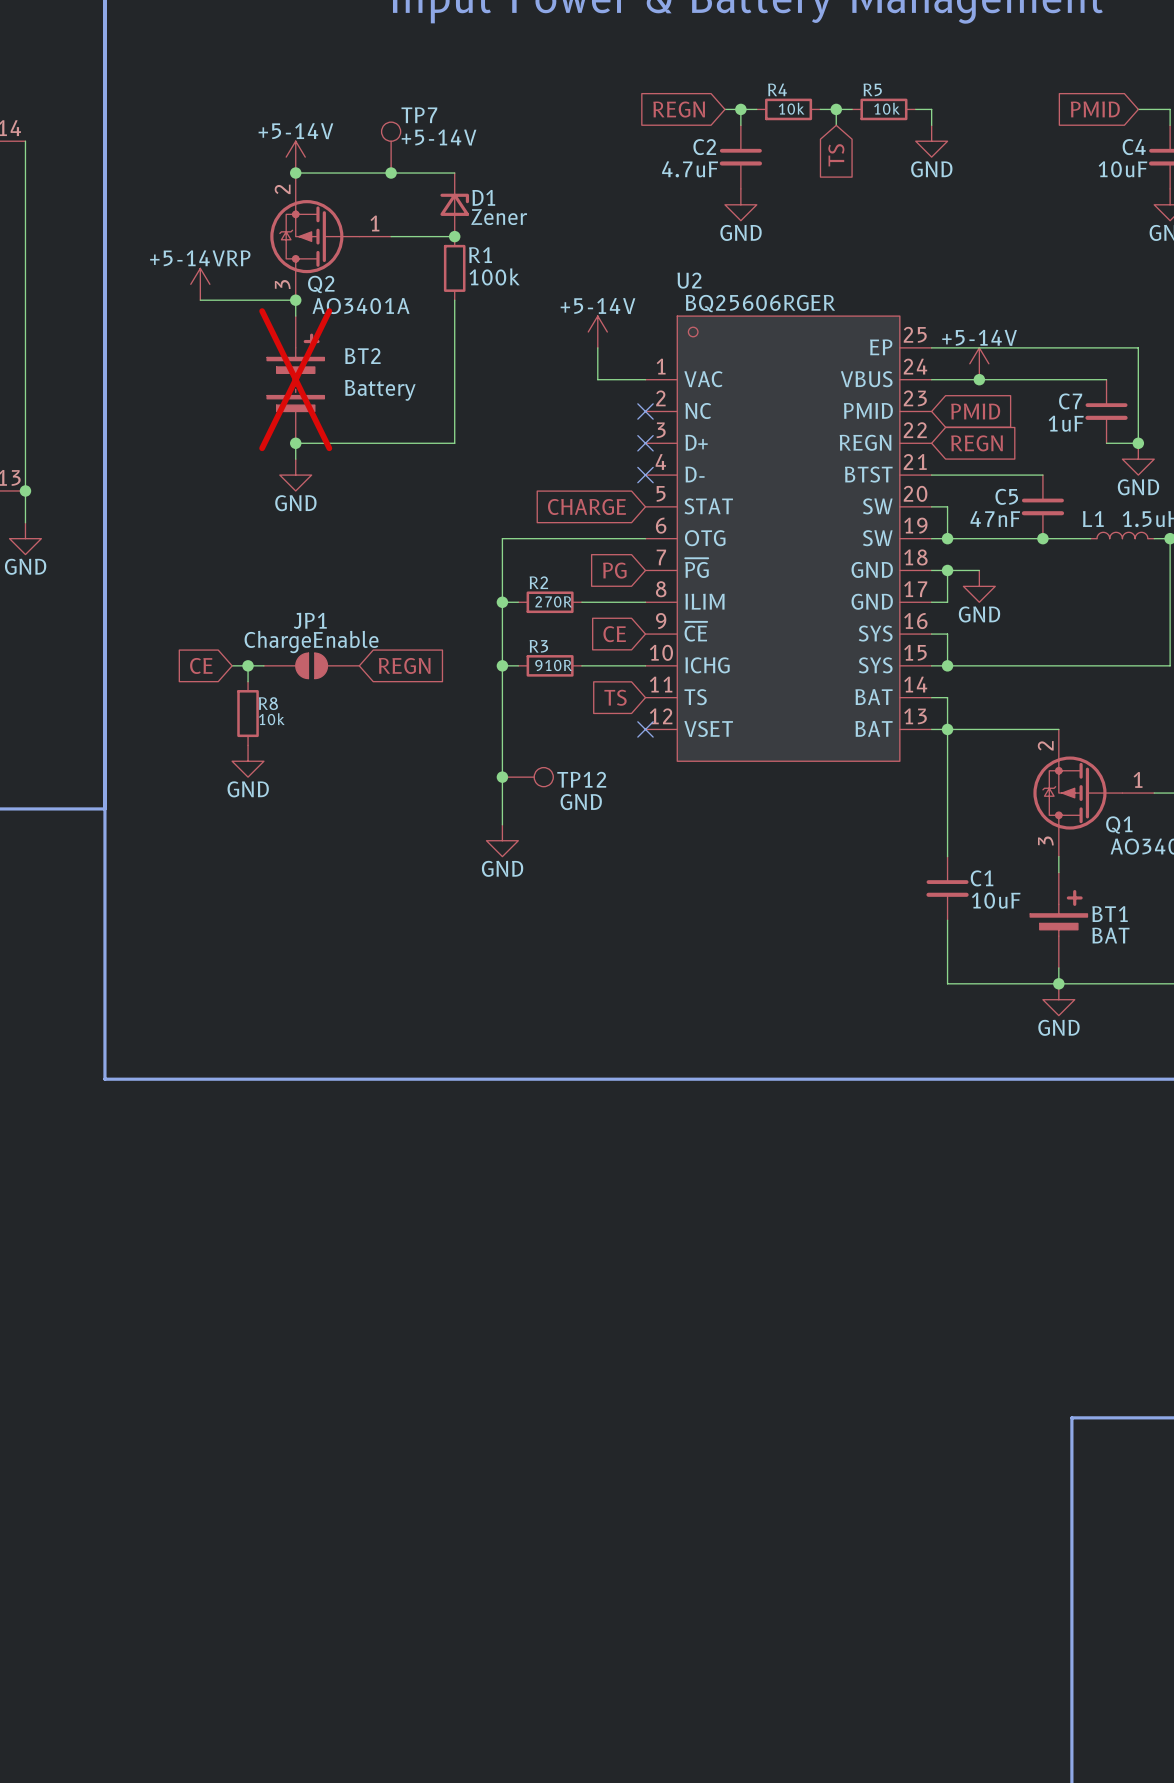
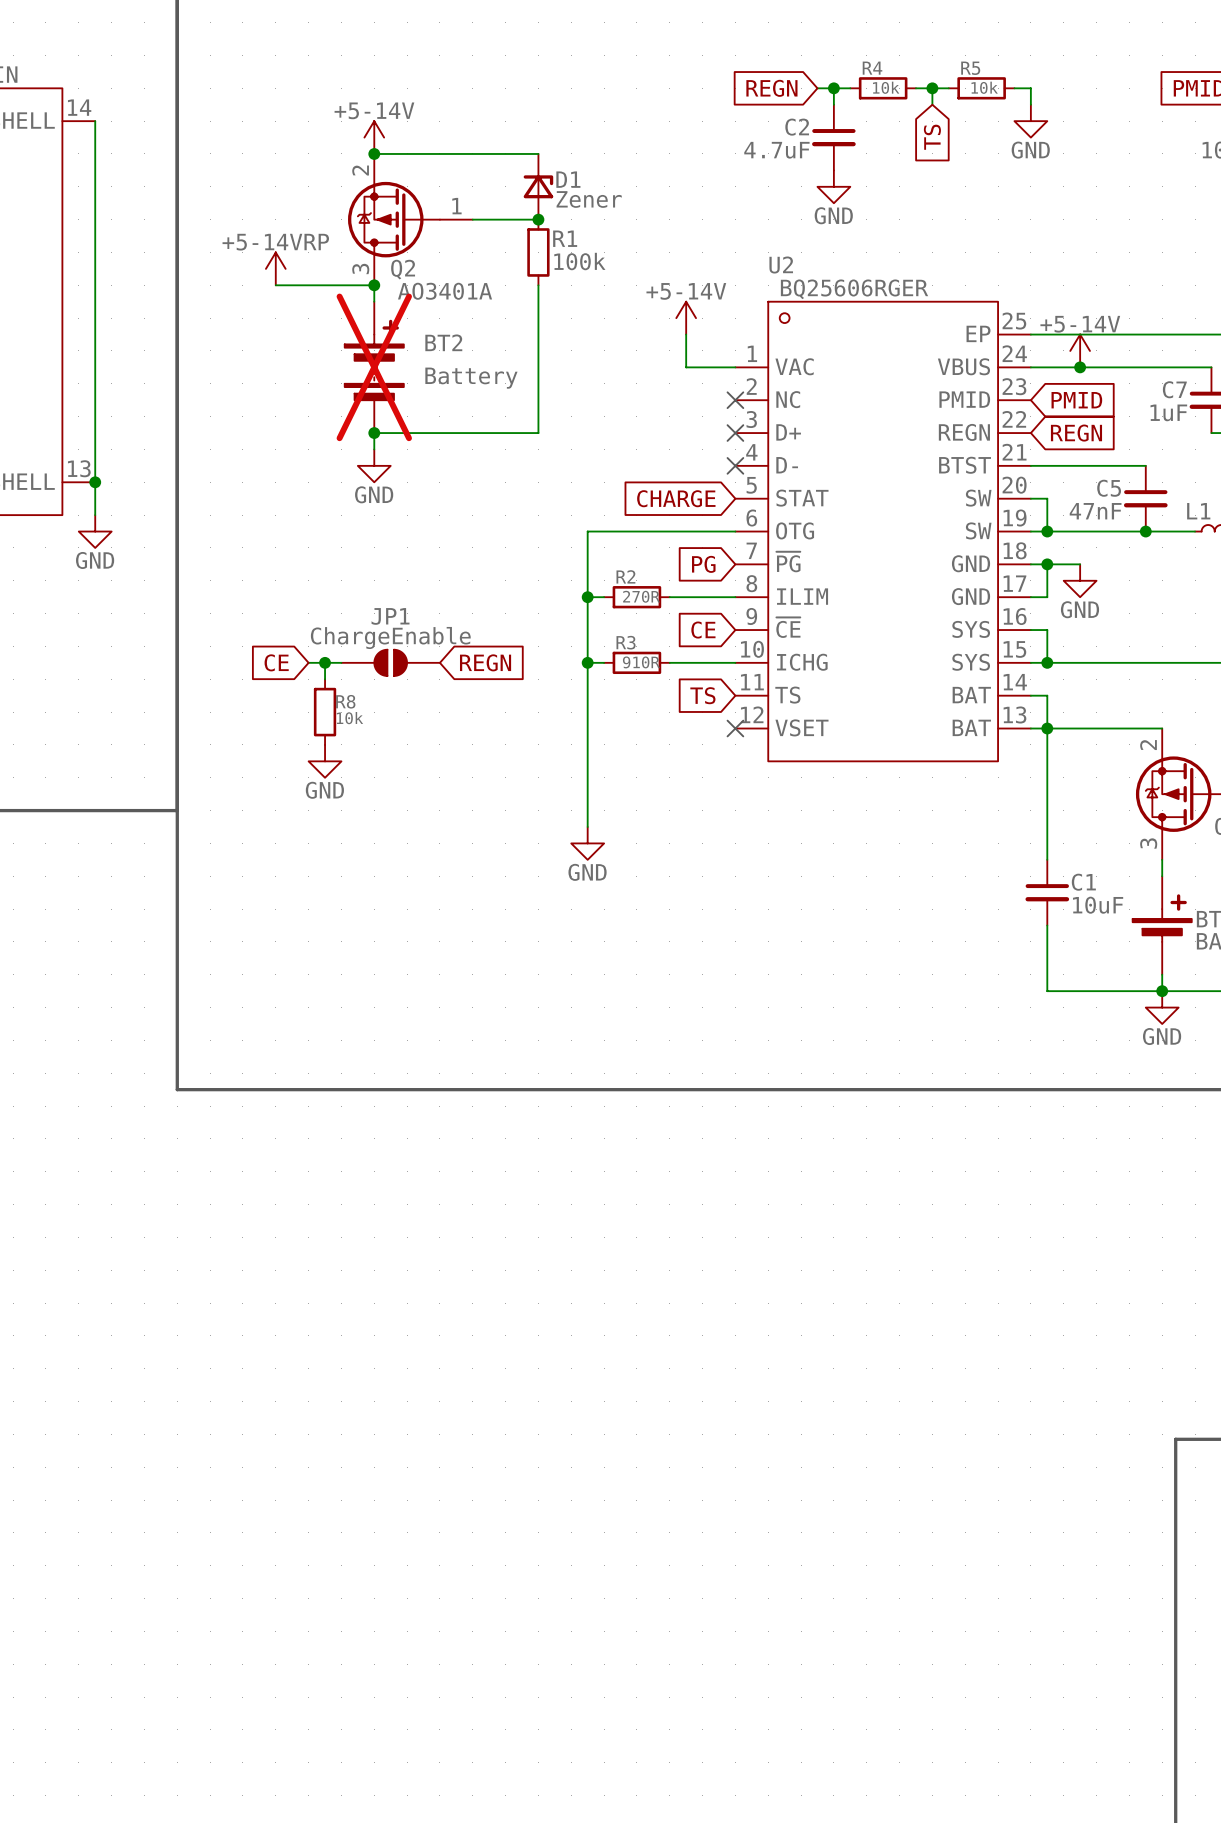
TP7: +5-14V (391, 147) -> none
junction: (391, 173) -> none
junction: (502, 777) -> none
TP12: GND (527, 777) -> none

